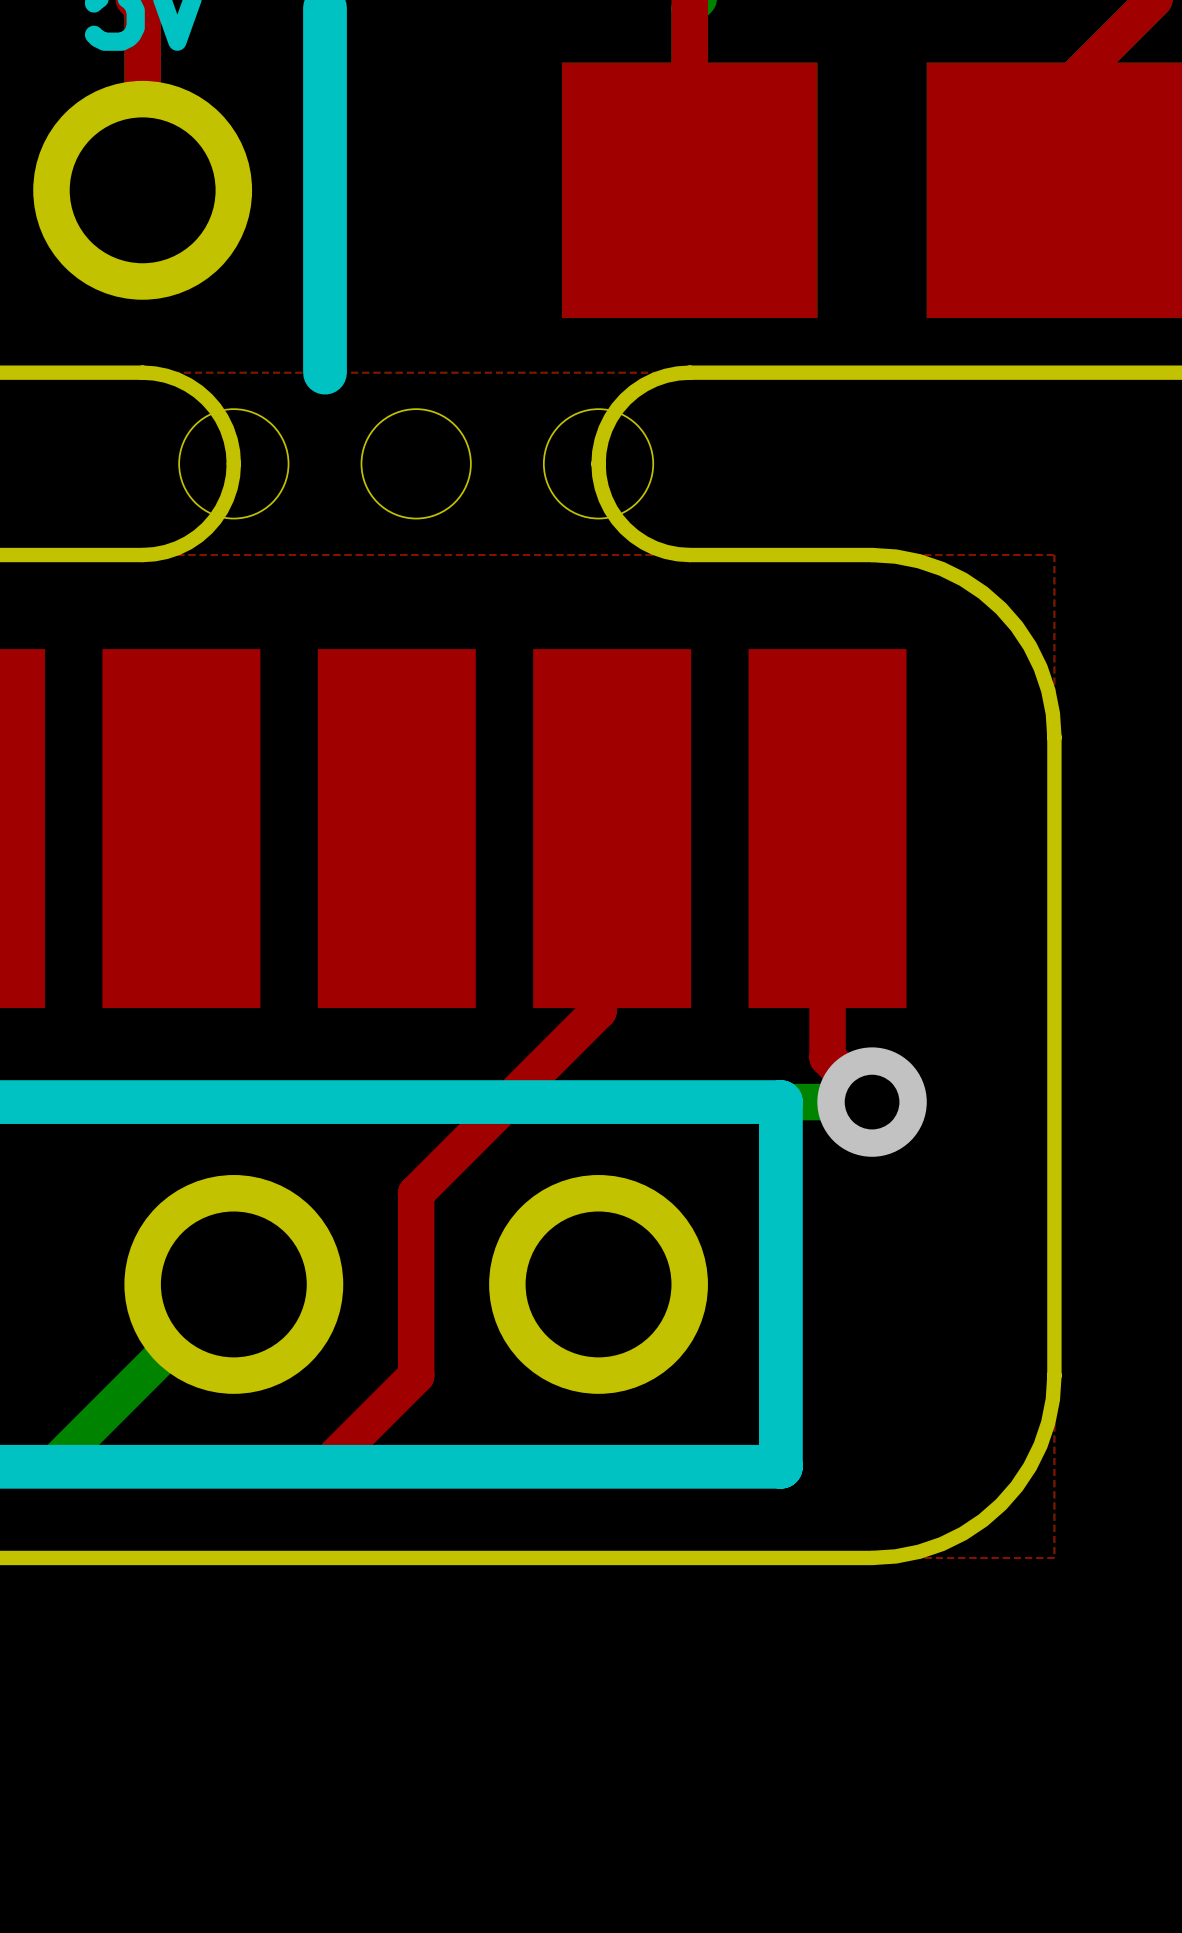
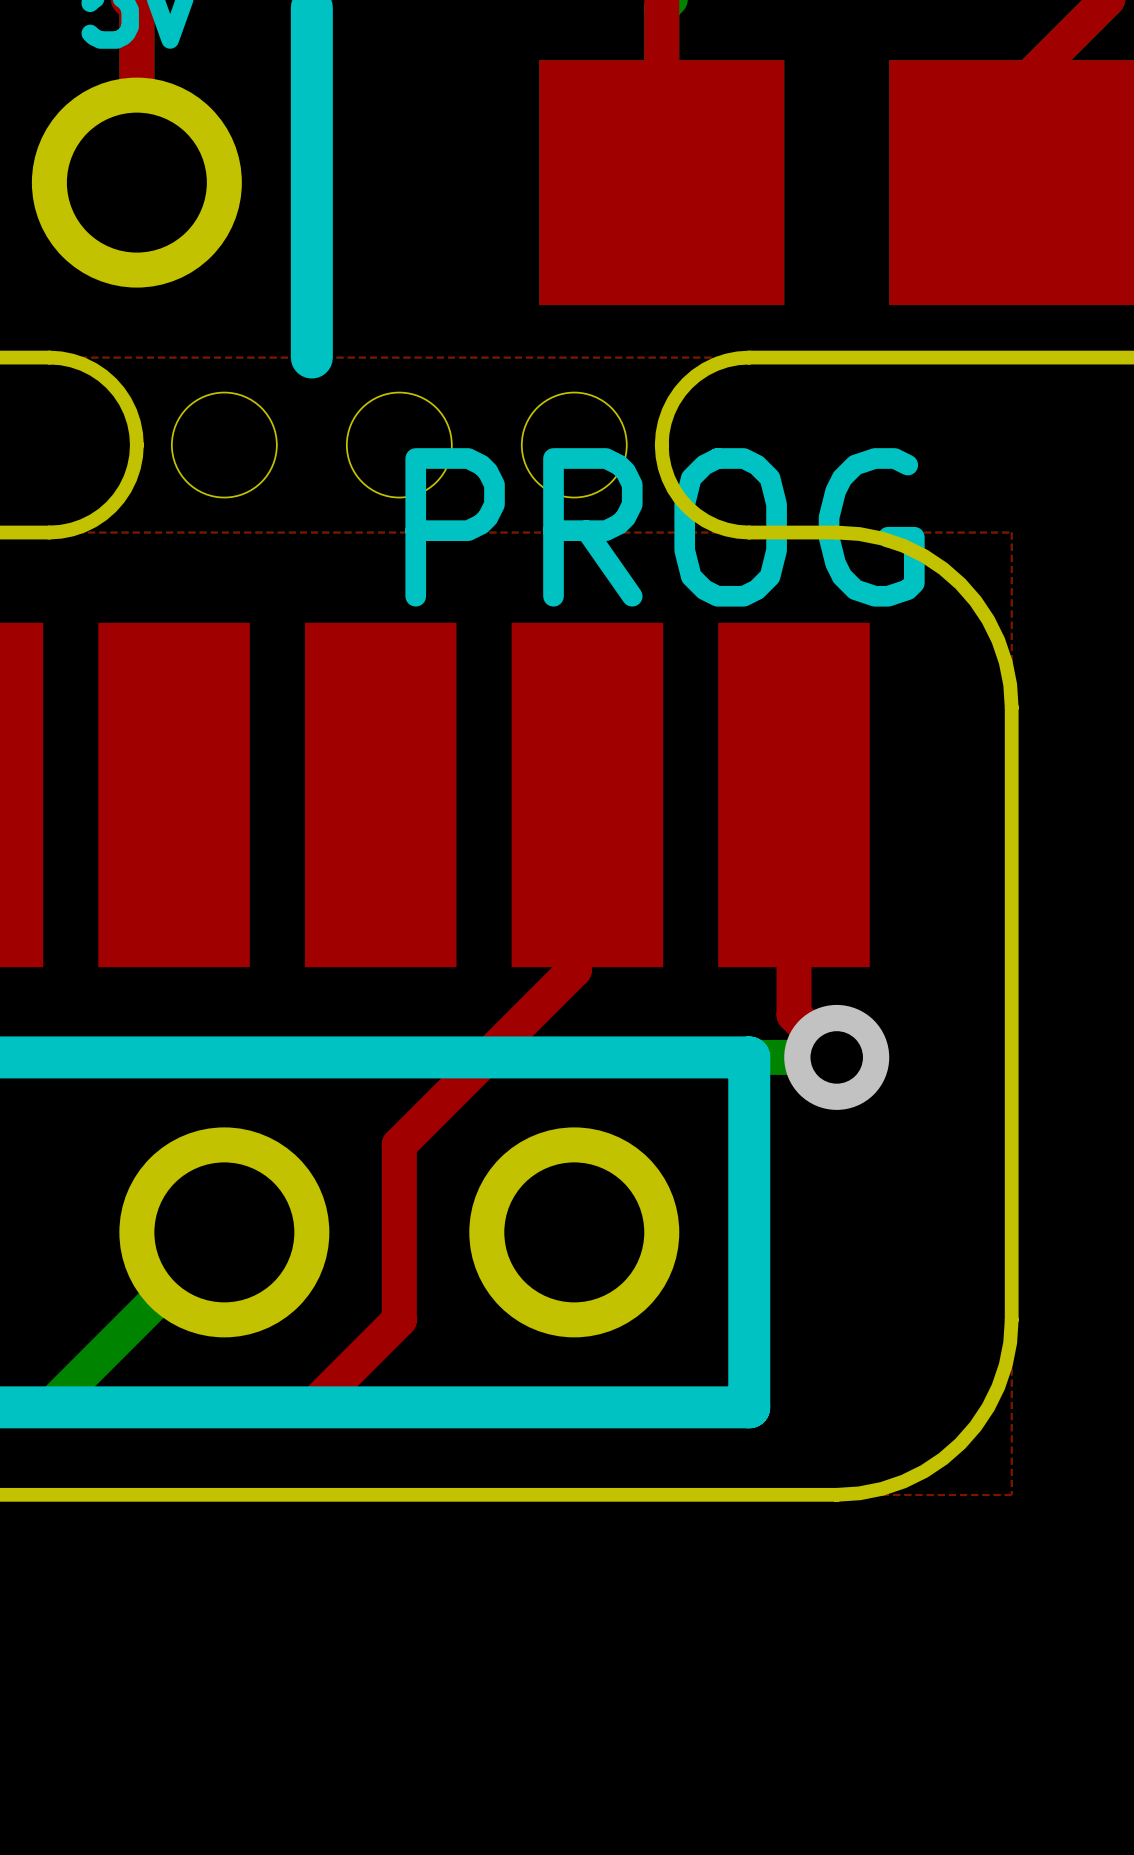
board edge: (51, 372) (154, 373) (166, 375) (188, 384) (207, 399) (221, 418) (230, 440) (233, 463) (230, 487) (221, 509) (207, 528) (188, 542) (166, 551) (154, 554) (51, 555) -> (49, 357) (82, 364) (111, 383) (130, 411) (136, 445) (130, 478) (111, 506) (82, 525) (49, 532)
board edge: (780, 372) (677, 373) (666, 375) (644, 384) (625, 399) (610, 418) (601, 440) (598, 463) (601, 487) (610, 509) (625, 528) (644, 542) (666, 551) (677, 554) (780, 555) -> (749, 357) (715, 364) (687, 383) (668, 411) (661, 445) (668, 478) (687, 506) (715, 525) (749, 532)
part value: none -> PROG (665, 527)

